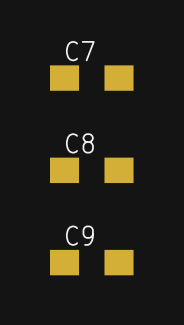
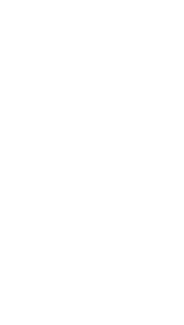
C7: (91, 78) -> none
C8: (91, 170) -> none
C9: (91, 262) -> none

